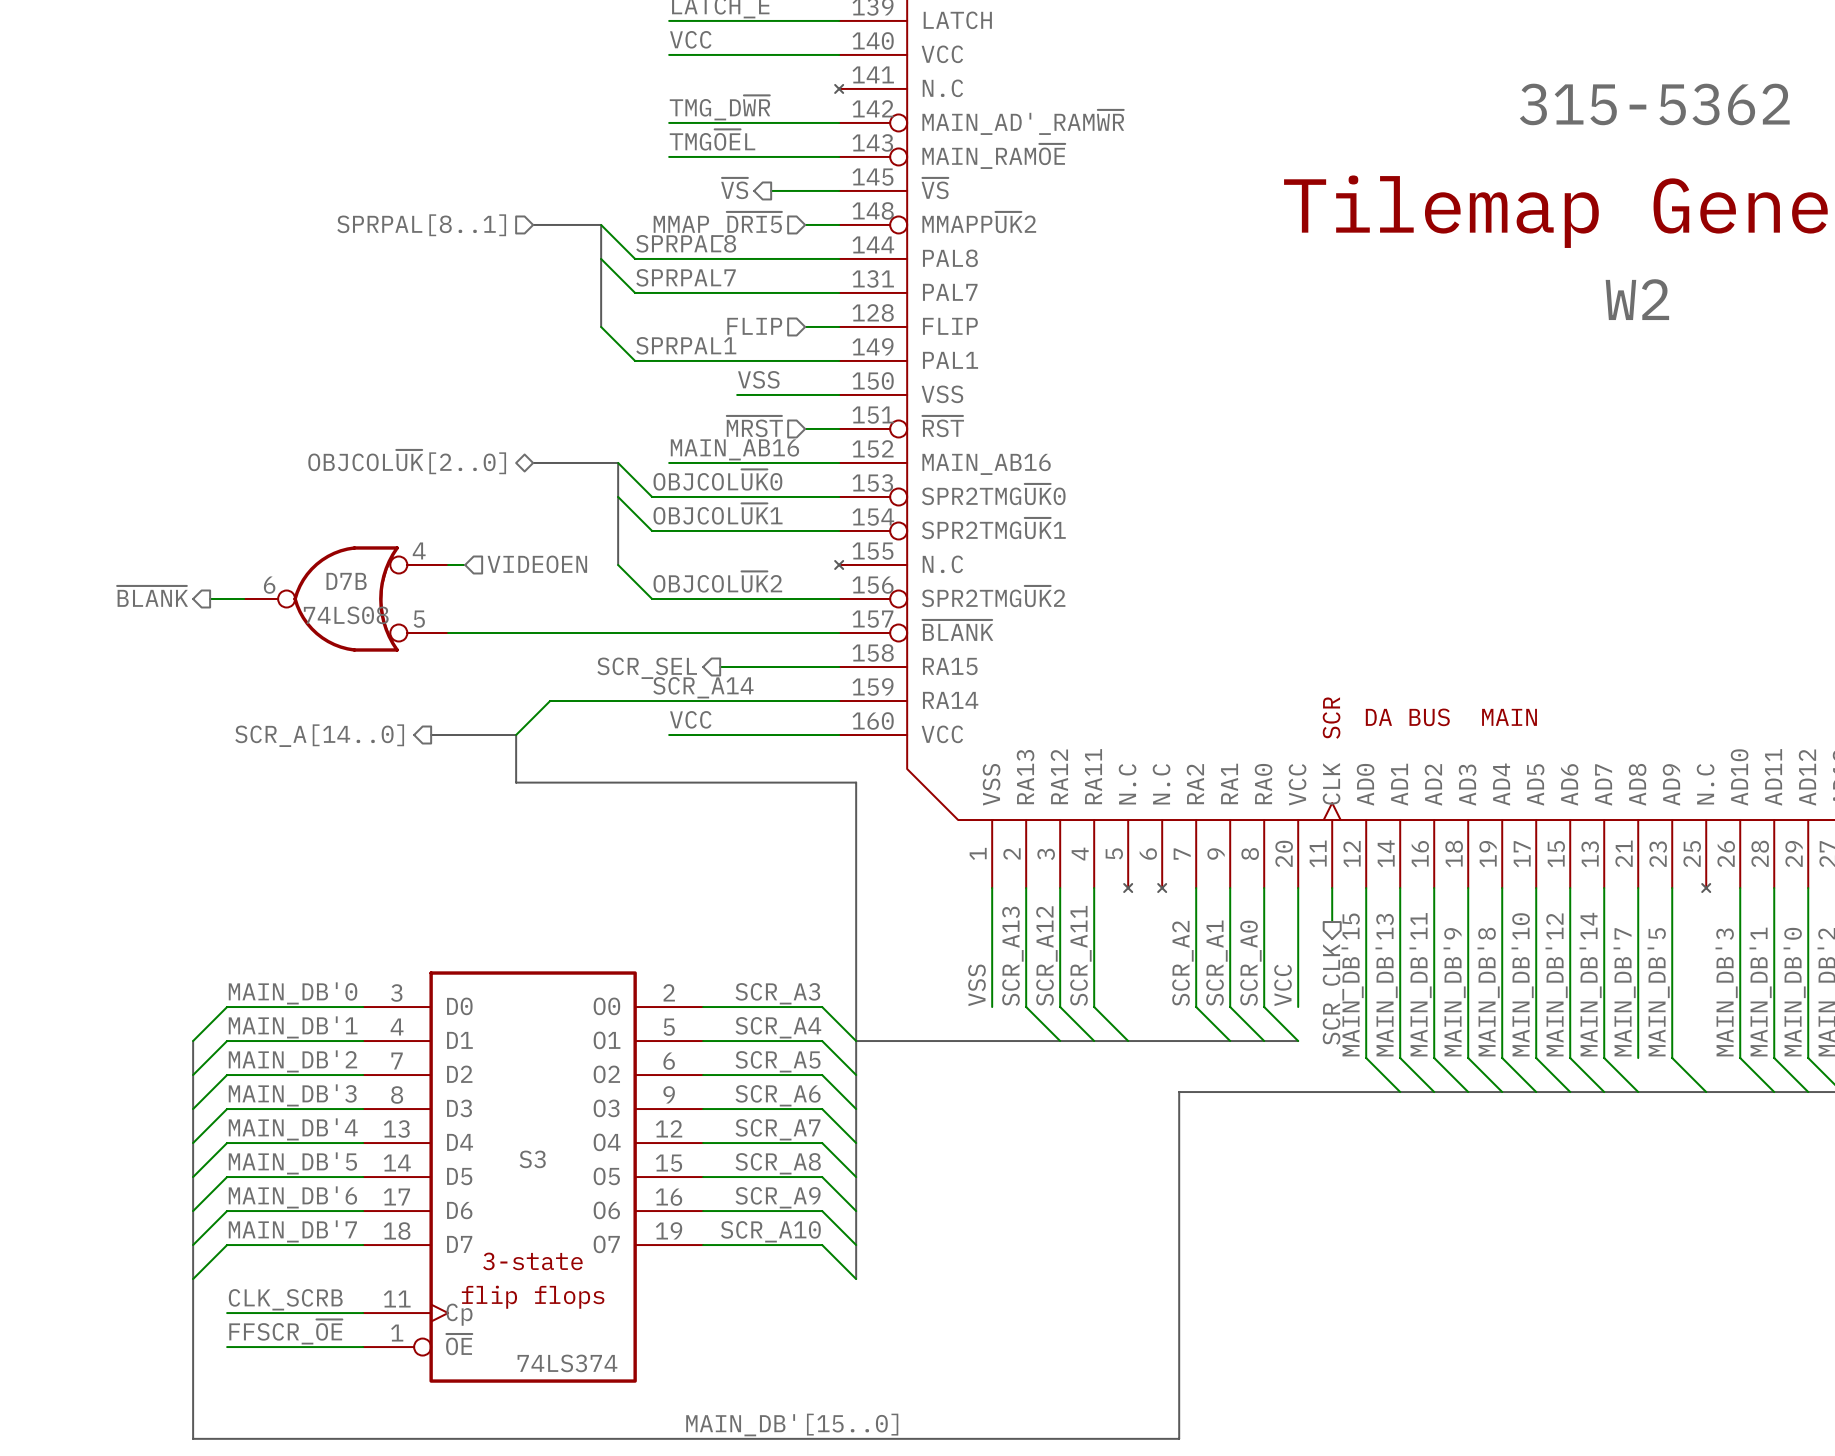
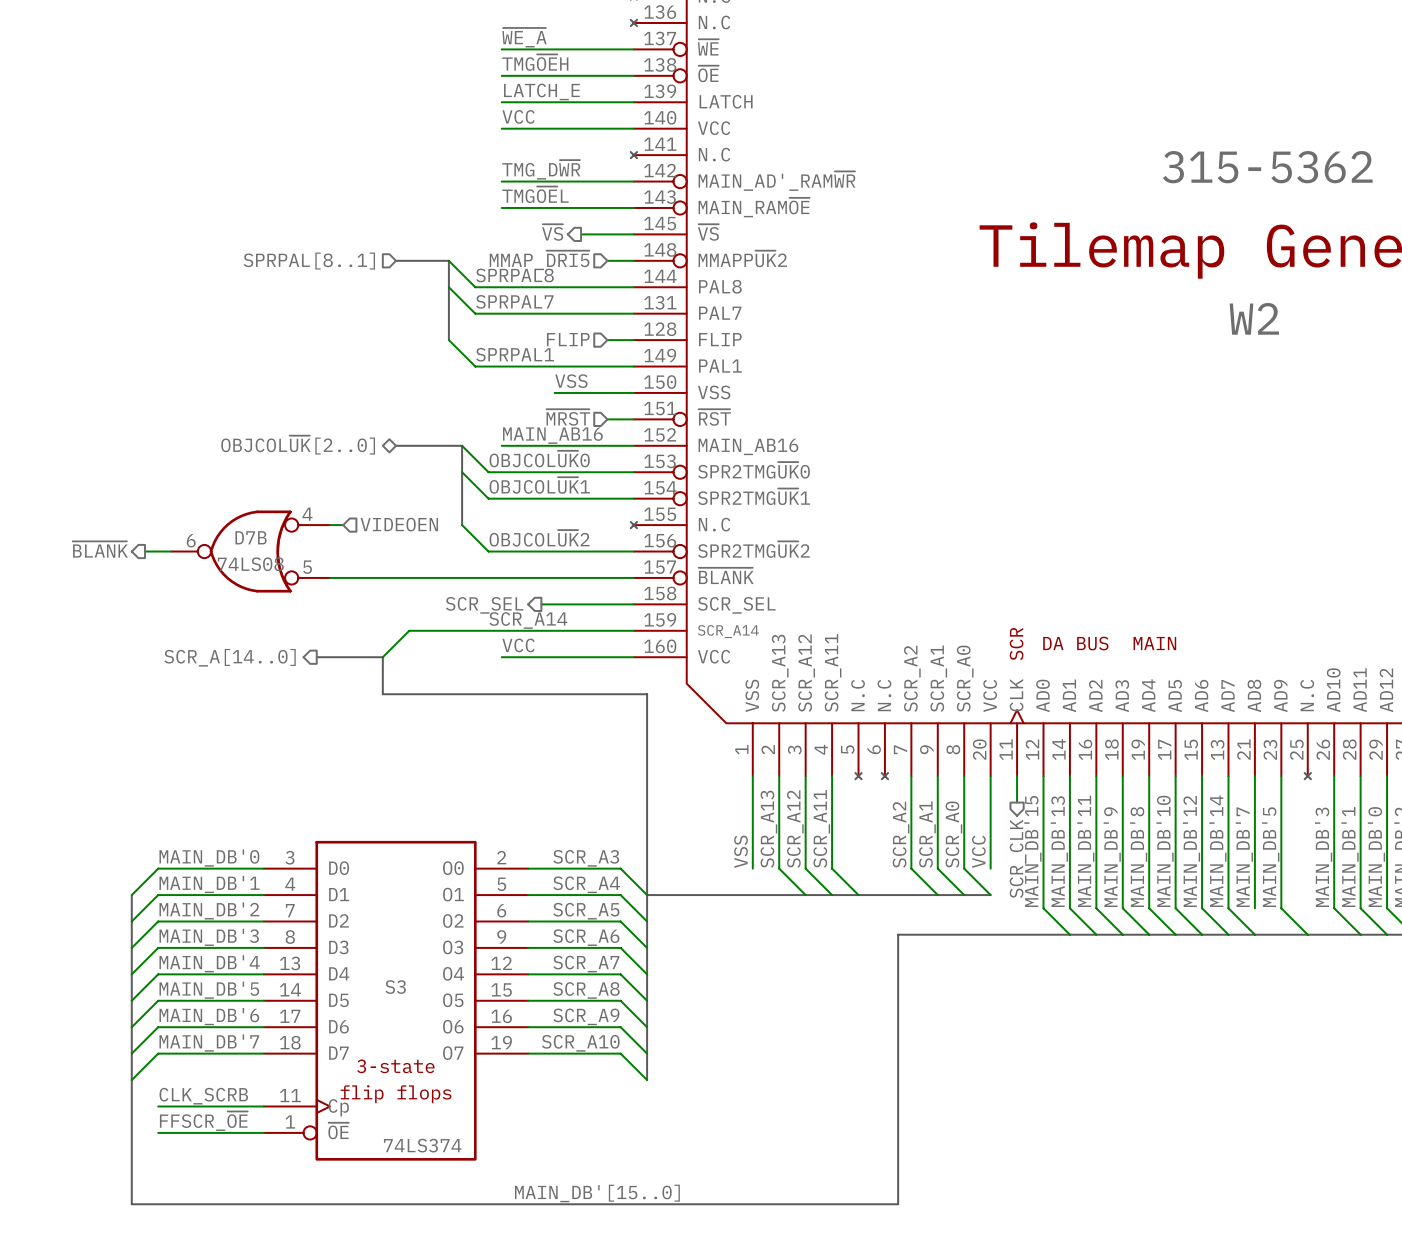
W2 pin name: RA15 (950, 666) -> SCR_SEL (736, 605)
W2 pin name: RA14 (950, 700) -> SCR_A14 (728, 631)
W2 pin name: RA12 (1059, 776) -> SCR_A12 (806, 673)
W2 pin name: RA11 (1093, 776) -> SCR_A11 (833, 672)
W2 pin name: RA13 (1025, 777) -> SCR_A13 (780, 673)
W2 pin name: RA1 (1229, 783) -> SCR_A1 (938, 678)
W2 pin name: RA2 (1195, 784) -> SCR_A2 (912, 678)
W2 pin name: RA0 (1263, 784) -> SCR_A0 (965, 678)

